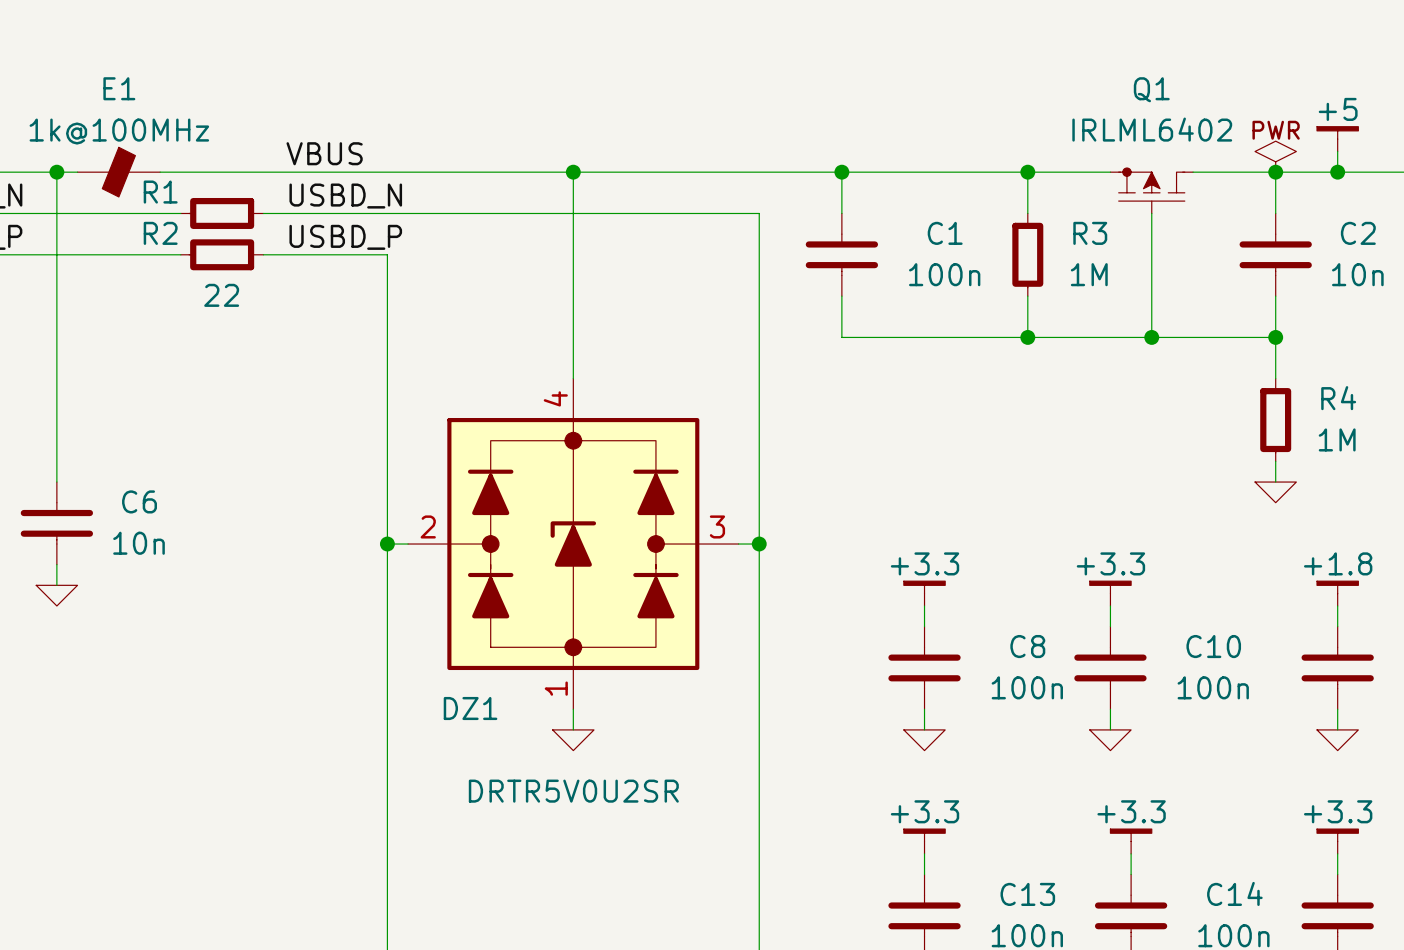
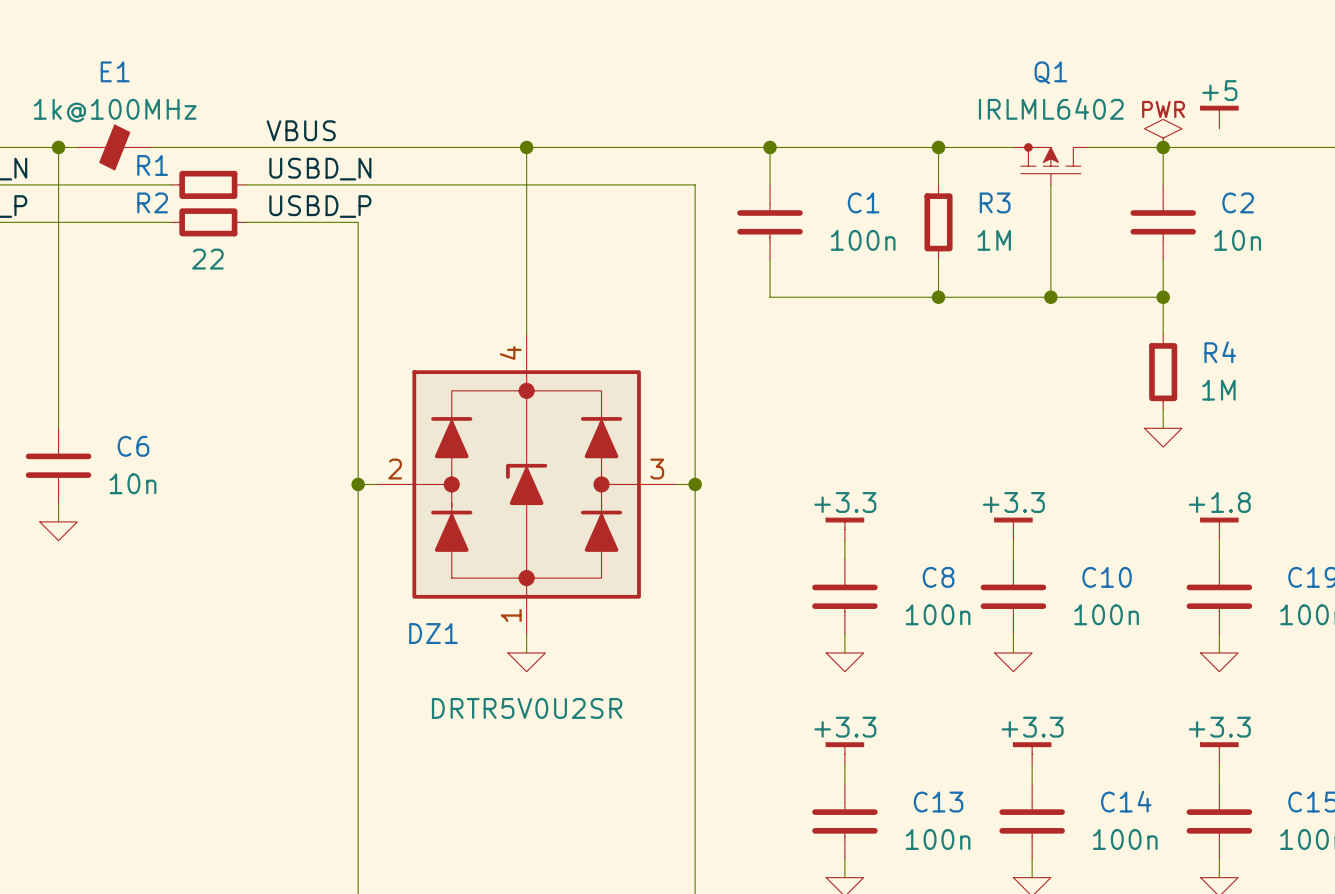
wire: (1337, 151) (1337, 172) -> none
junction: (1337, 172) -> none

